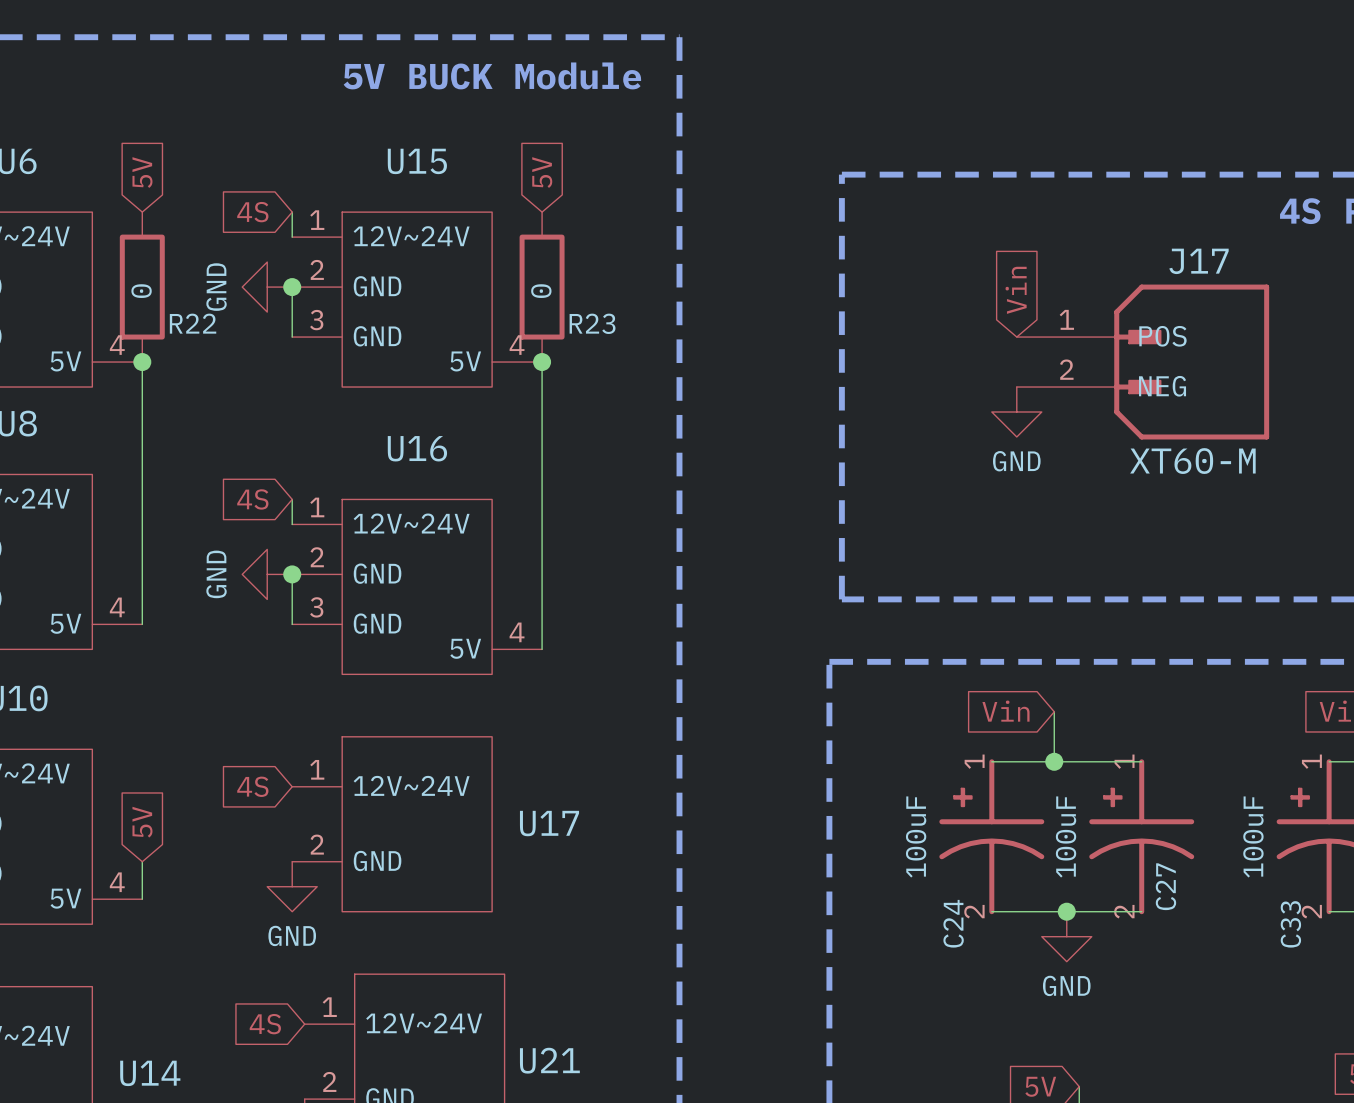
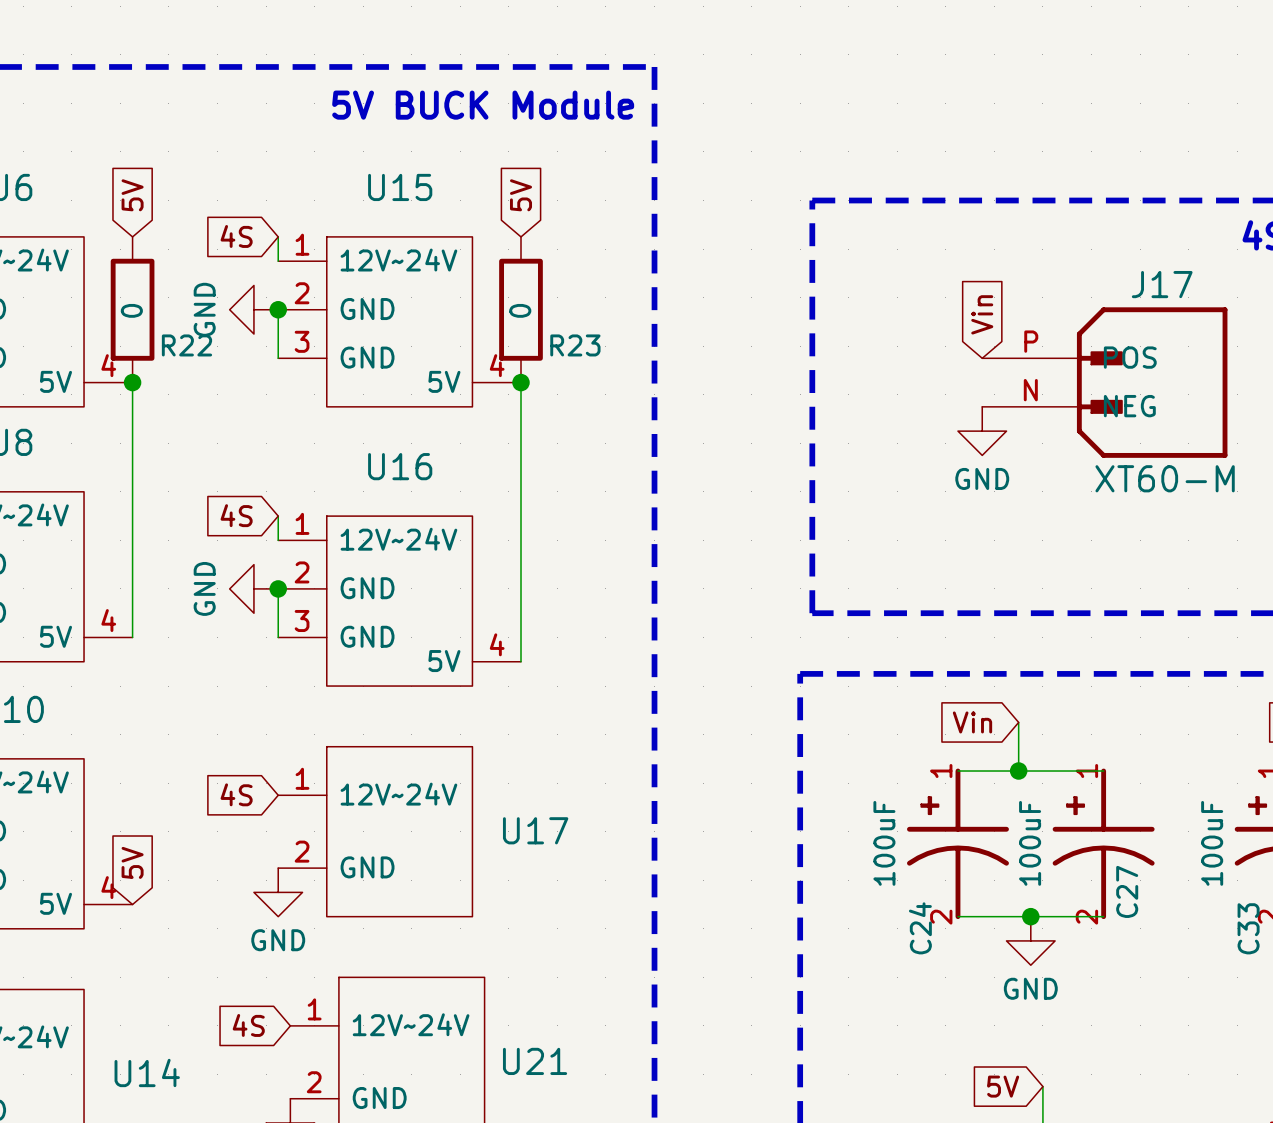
J17 pin number: 1 (1066, 319) -> P (1031, 341)
J17 pin number: 2 (1066, 369) -> N (1030, 390)
global label position: 5V (142, 822) -> 5V (132, 862)
wire: (142, 861) (142, 899) -> none

